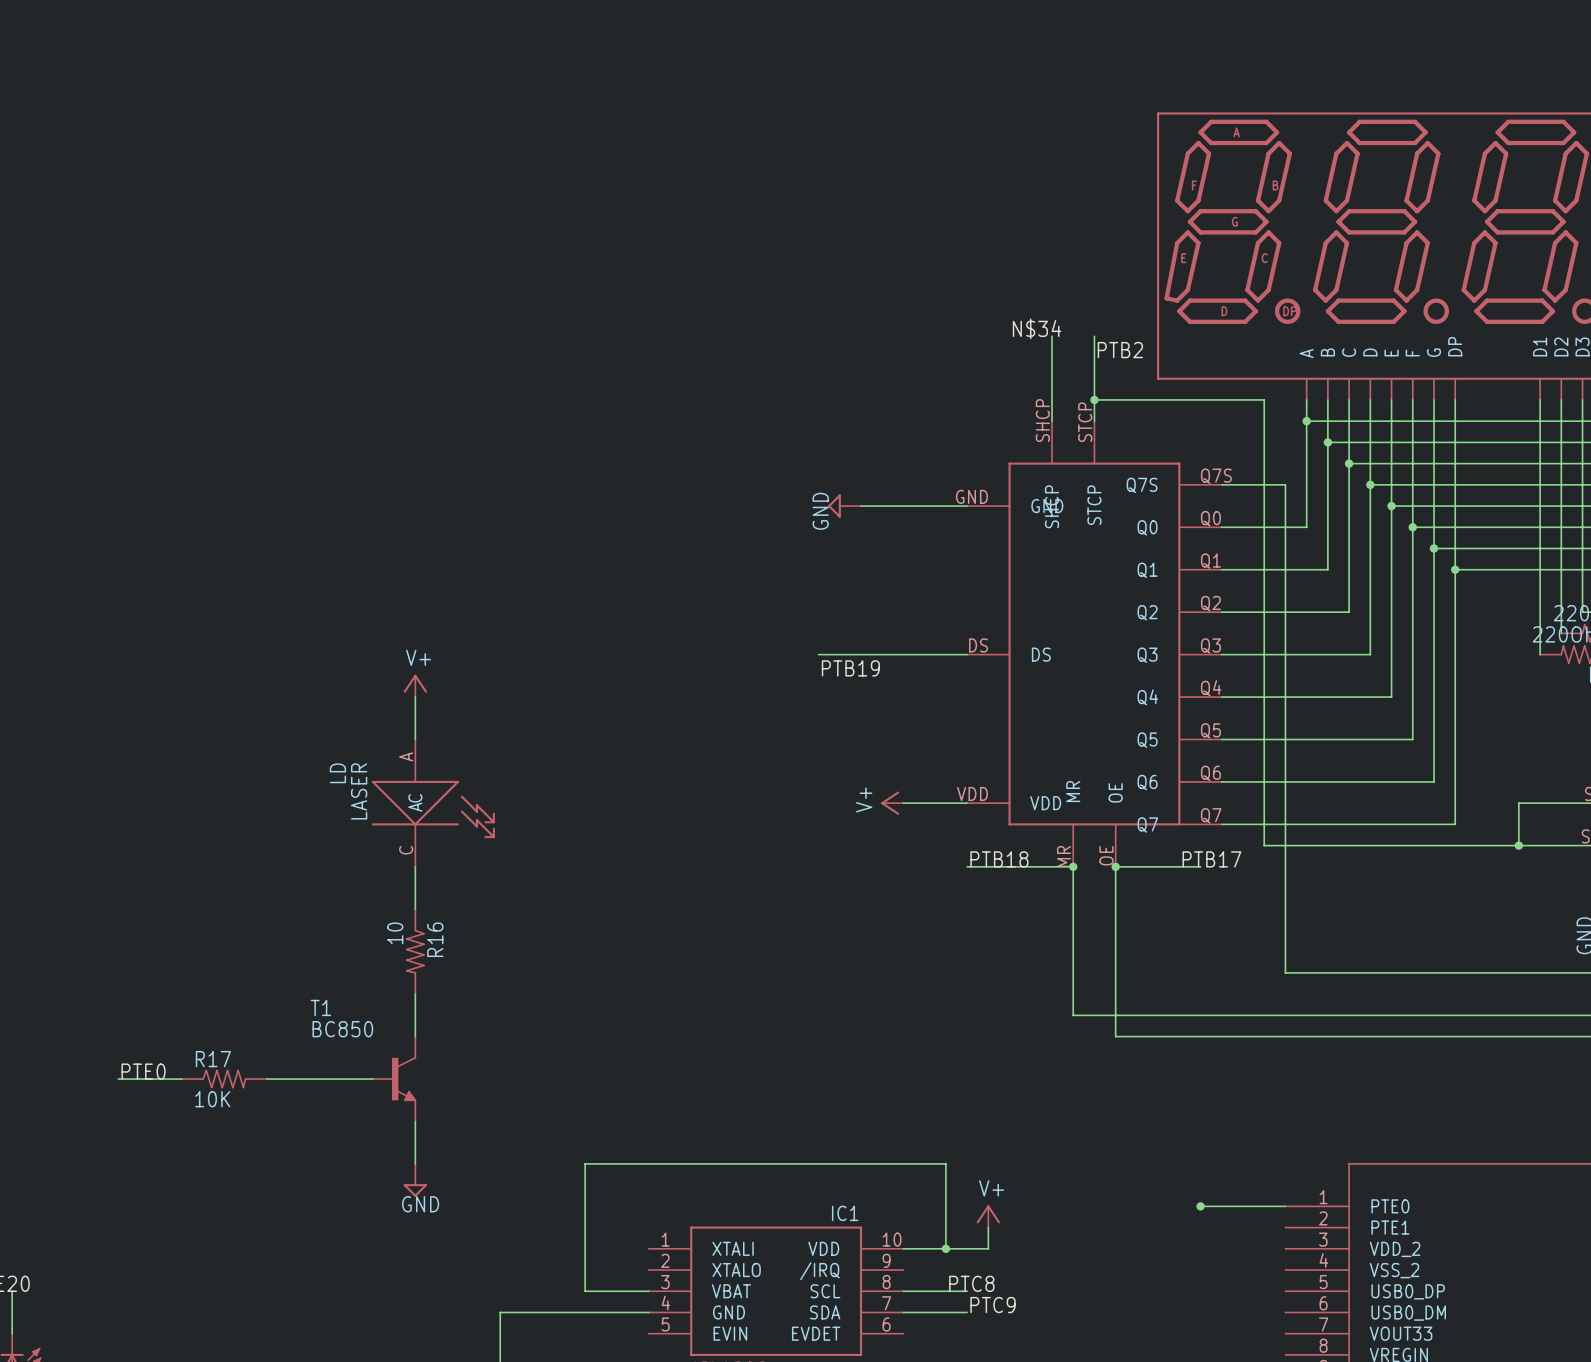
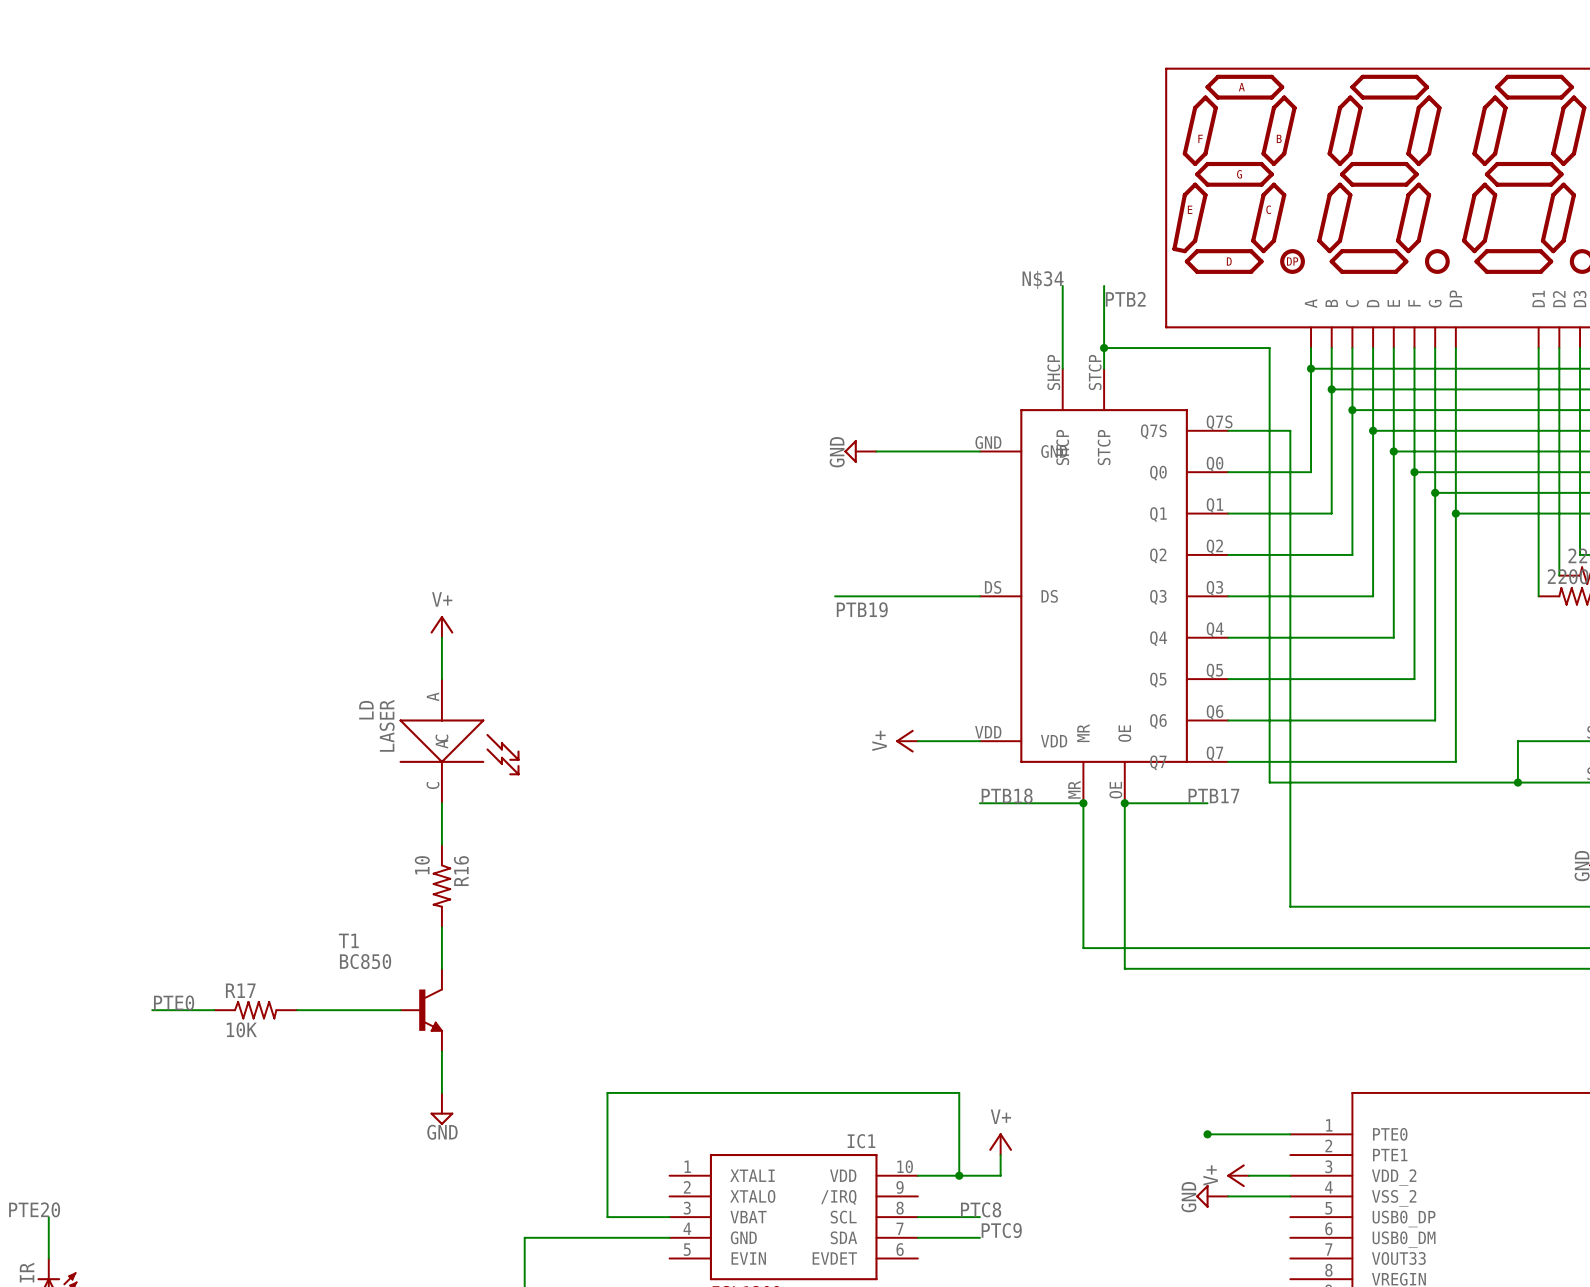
power symbol: none -> V+ (1238, 1175)
wire: none -> (1248, 1175) (1290, 1175)
power symbol: none -> GND (1212, 1196)
wire: none -> (1228, 1196) (1290, 1196)

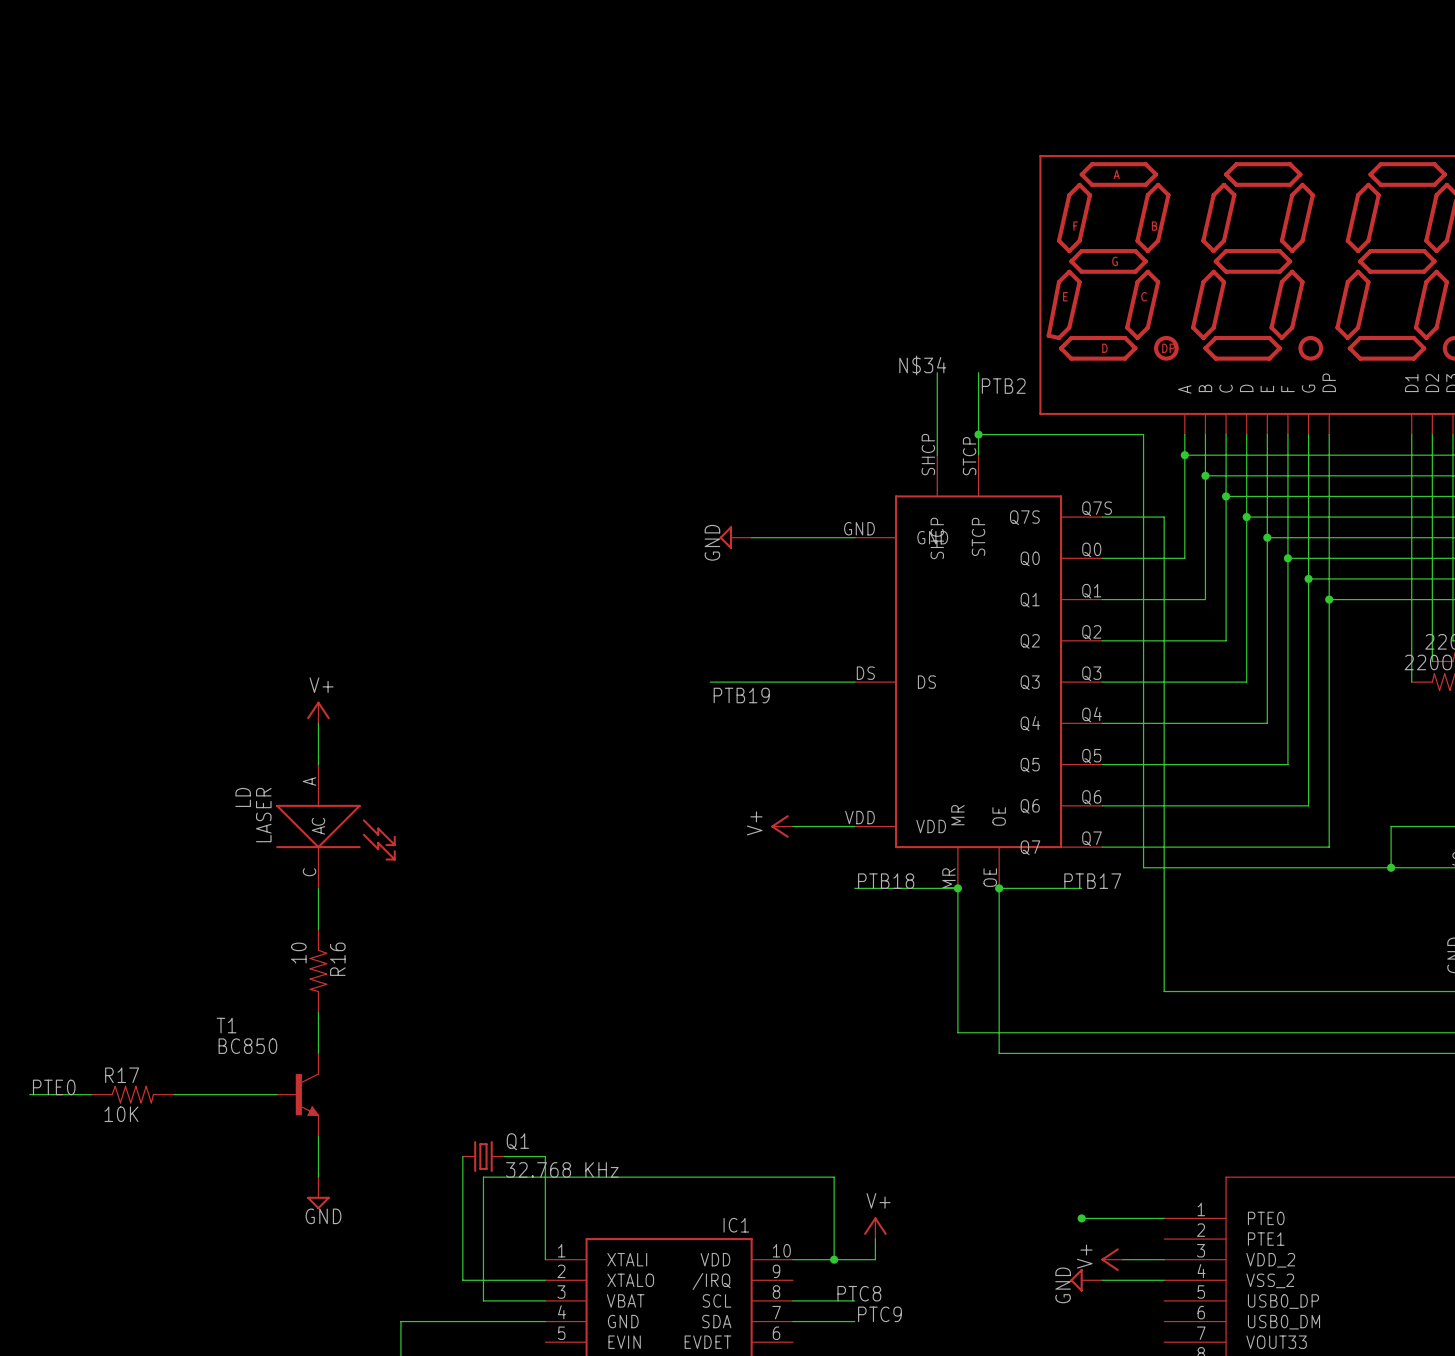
wire: none -> (462, 1156) (462, 1280) (545, 1280)
Q1: none -> 32.768 KHz (483, 1156)
wire: none -> (504, 1156) (545, 1156) (545, 1259)

